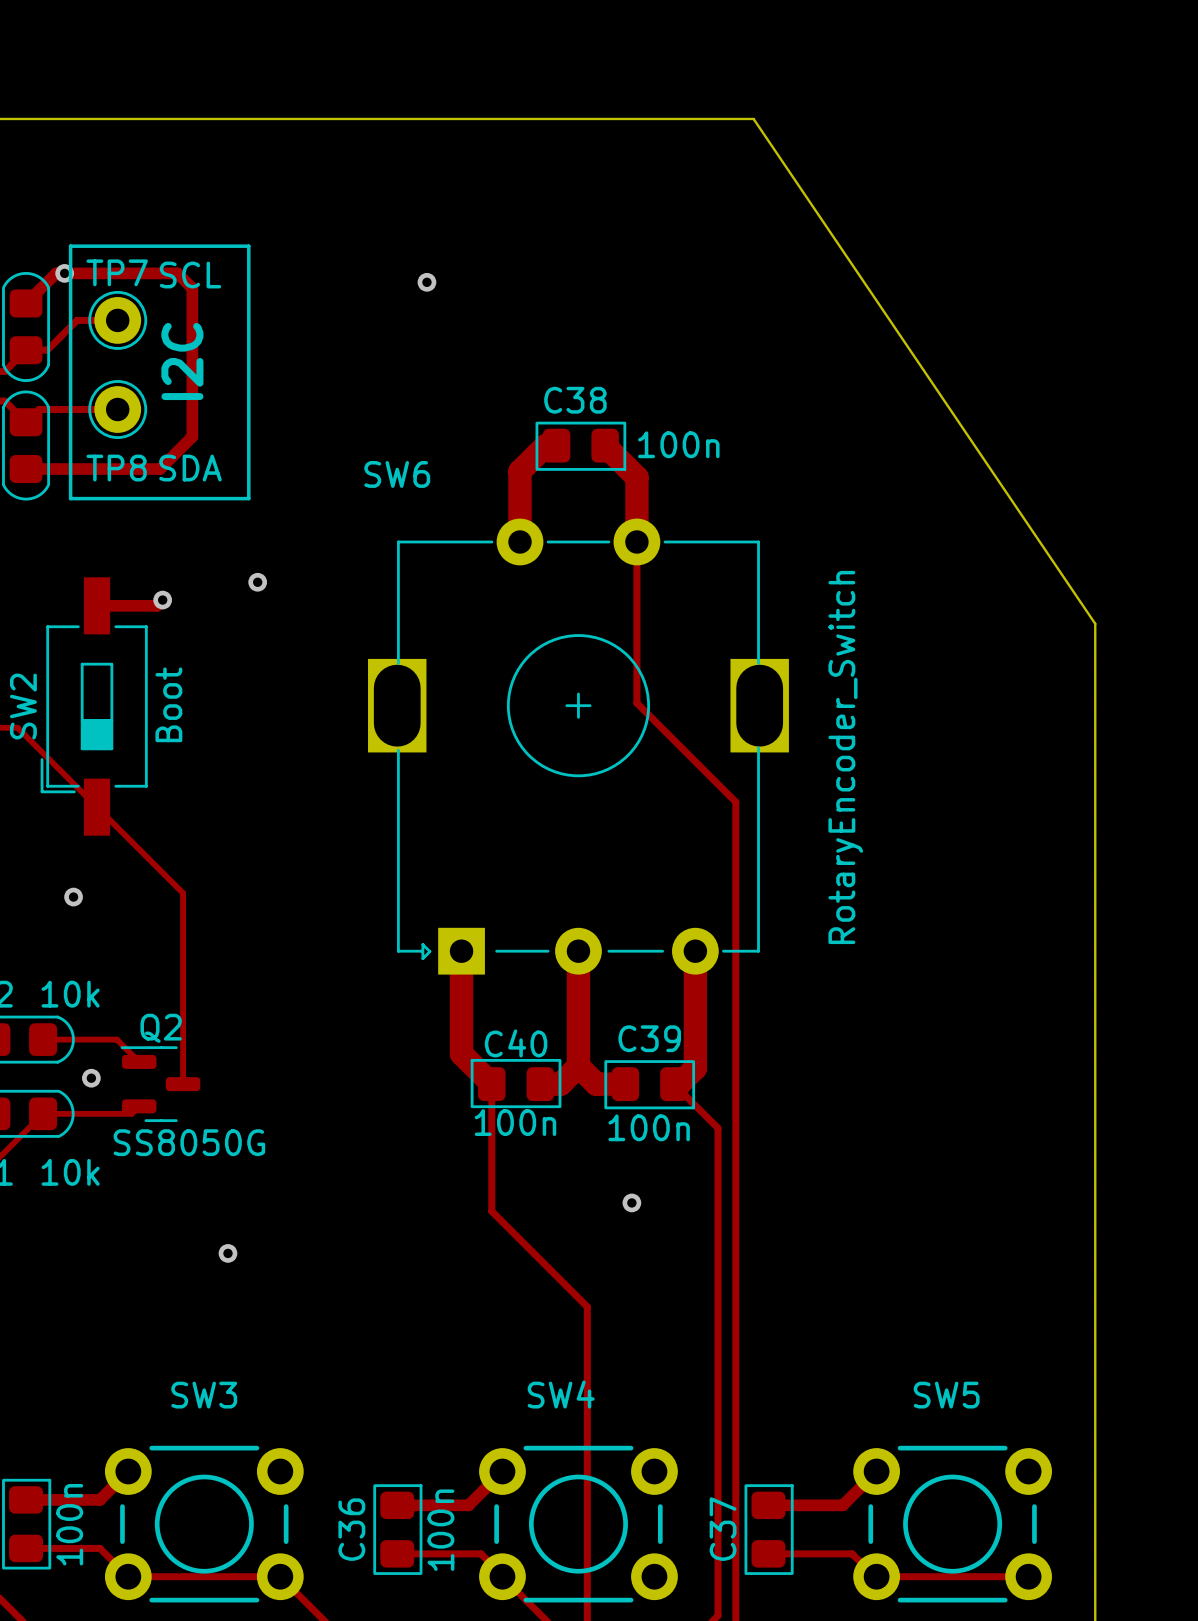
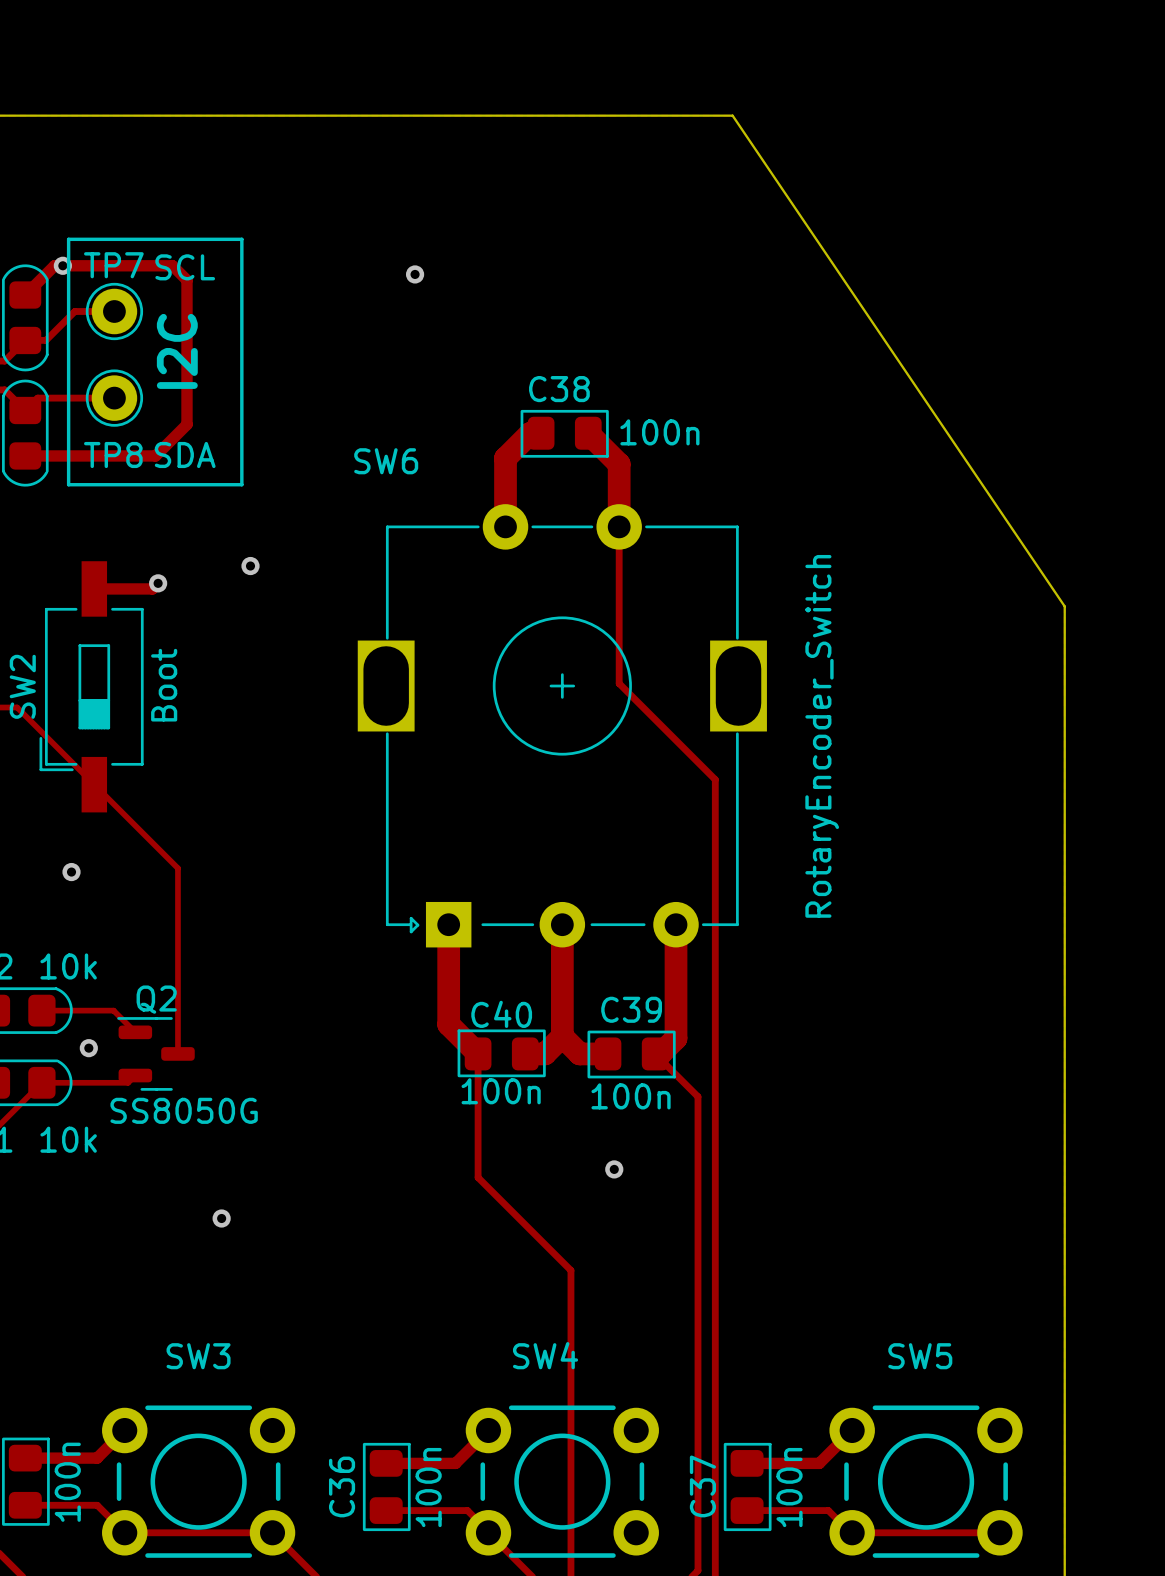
SW6 footprint: [368, 518, 789, 975] -> [357, 504, 767, 948]
C37 value: none -> 100n (789, 1487)

